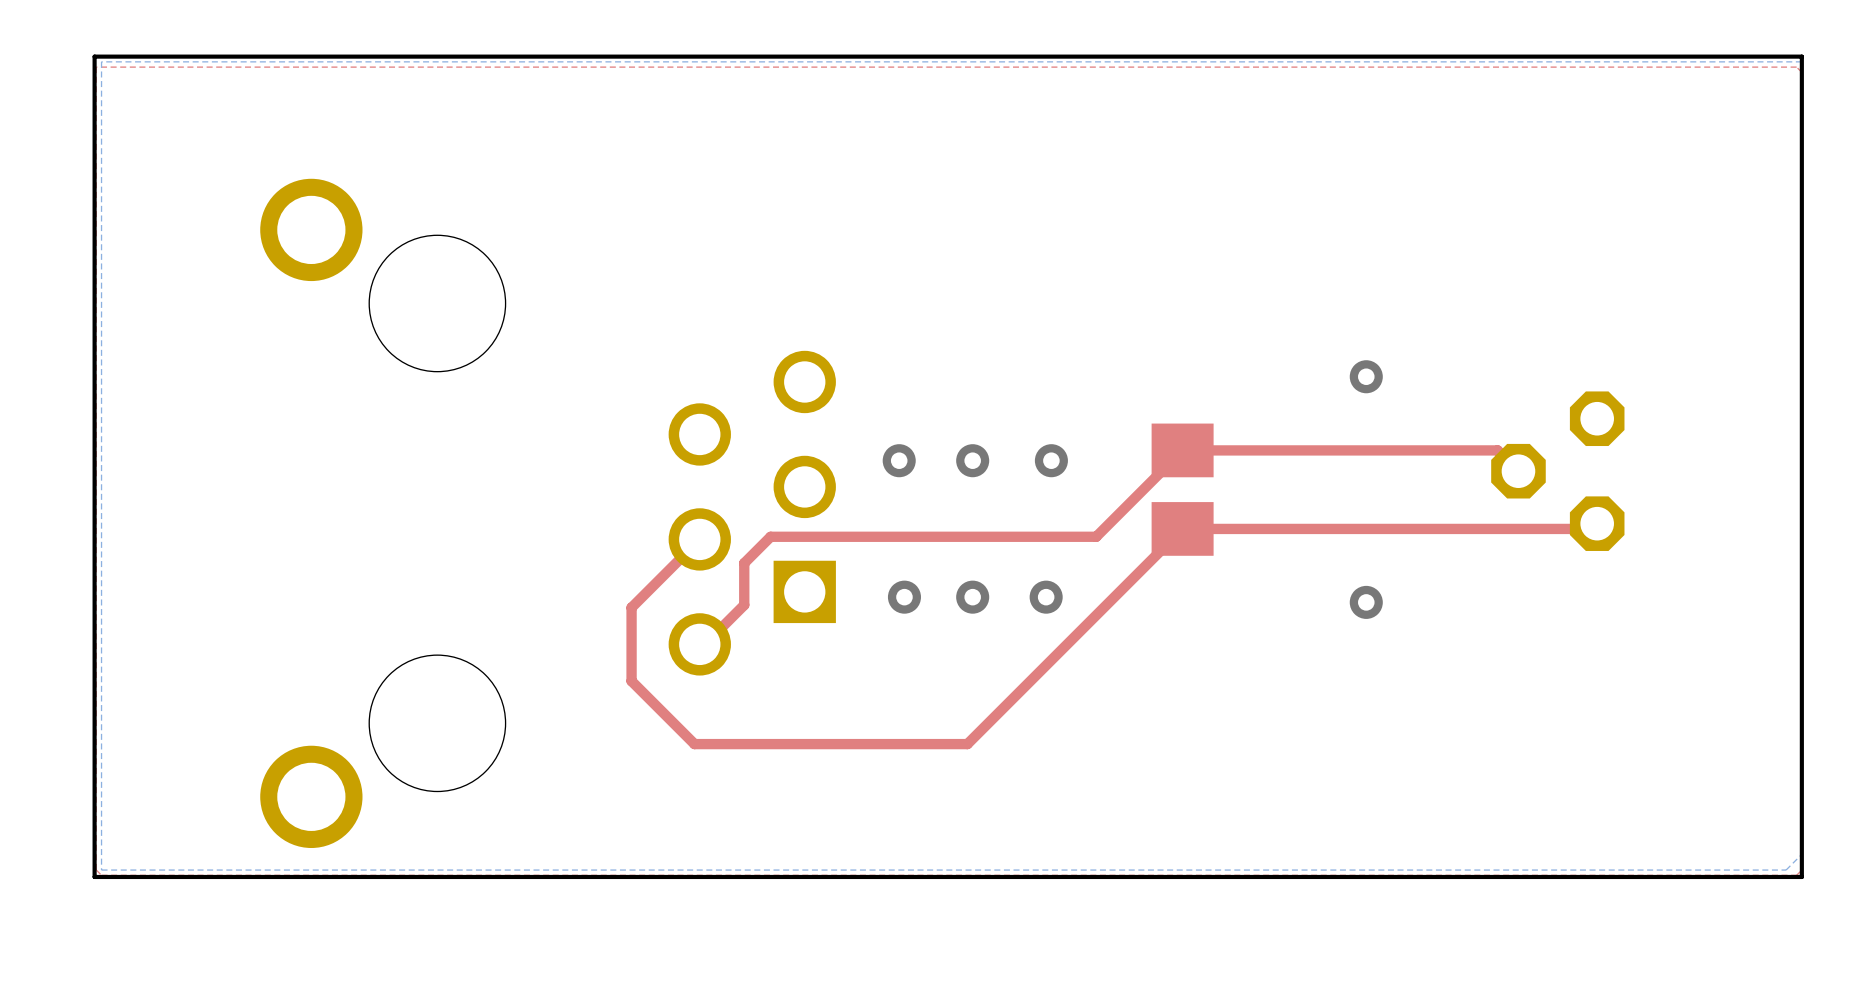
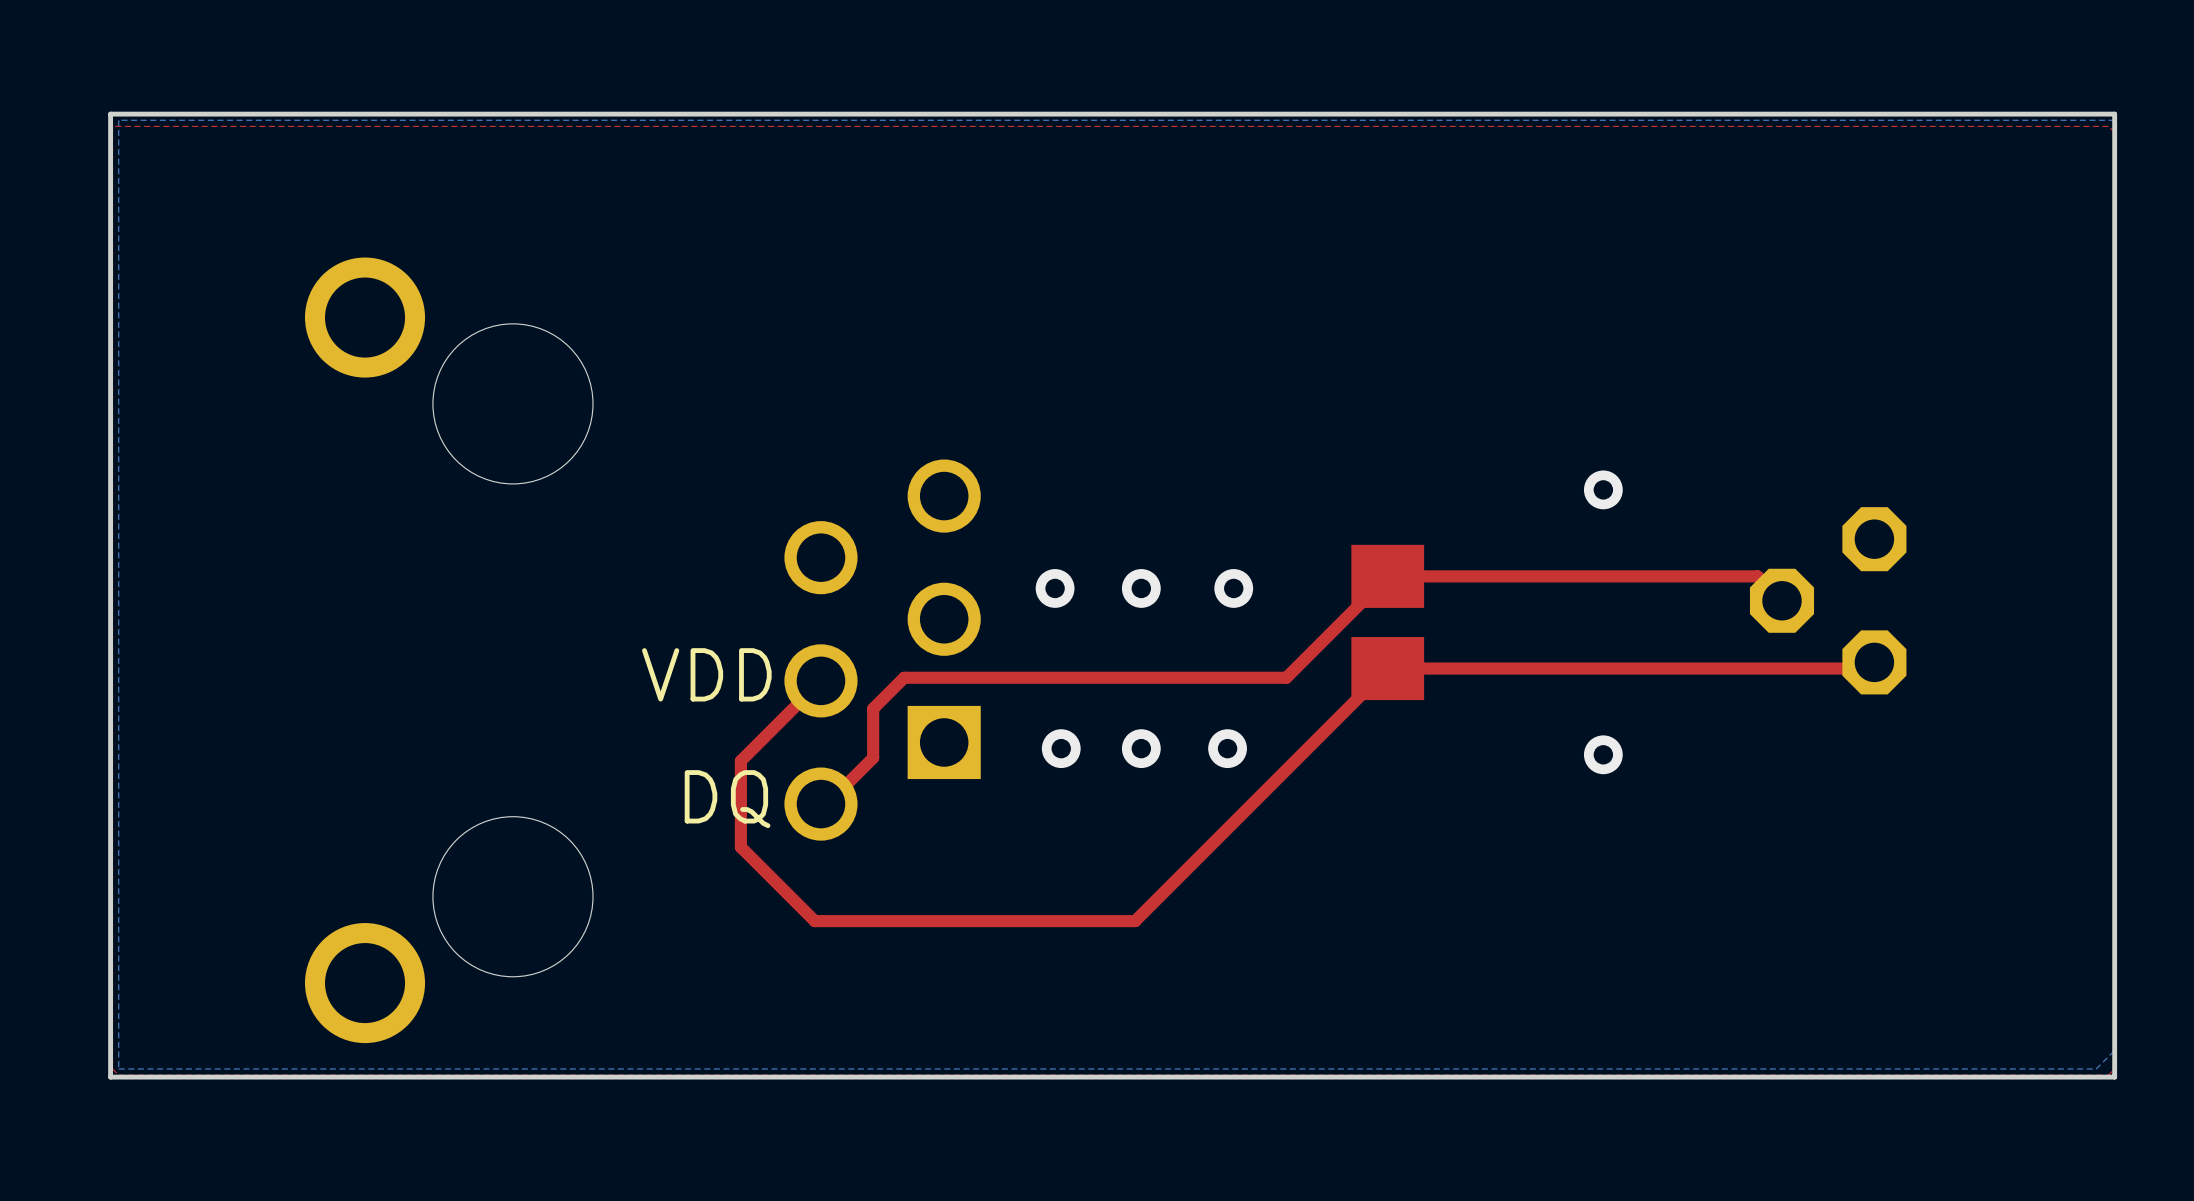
text: none -> VDD (706, 674)
text: none -> DQ (727, 799)

